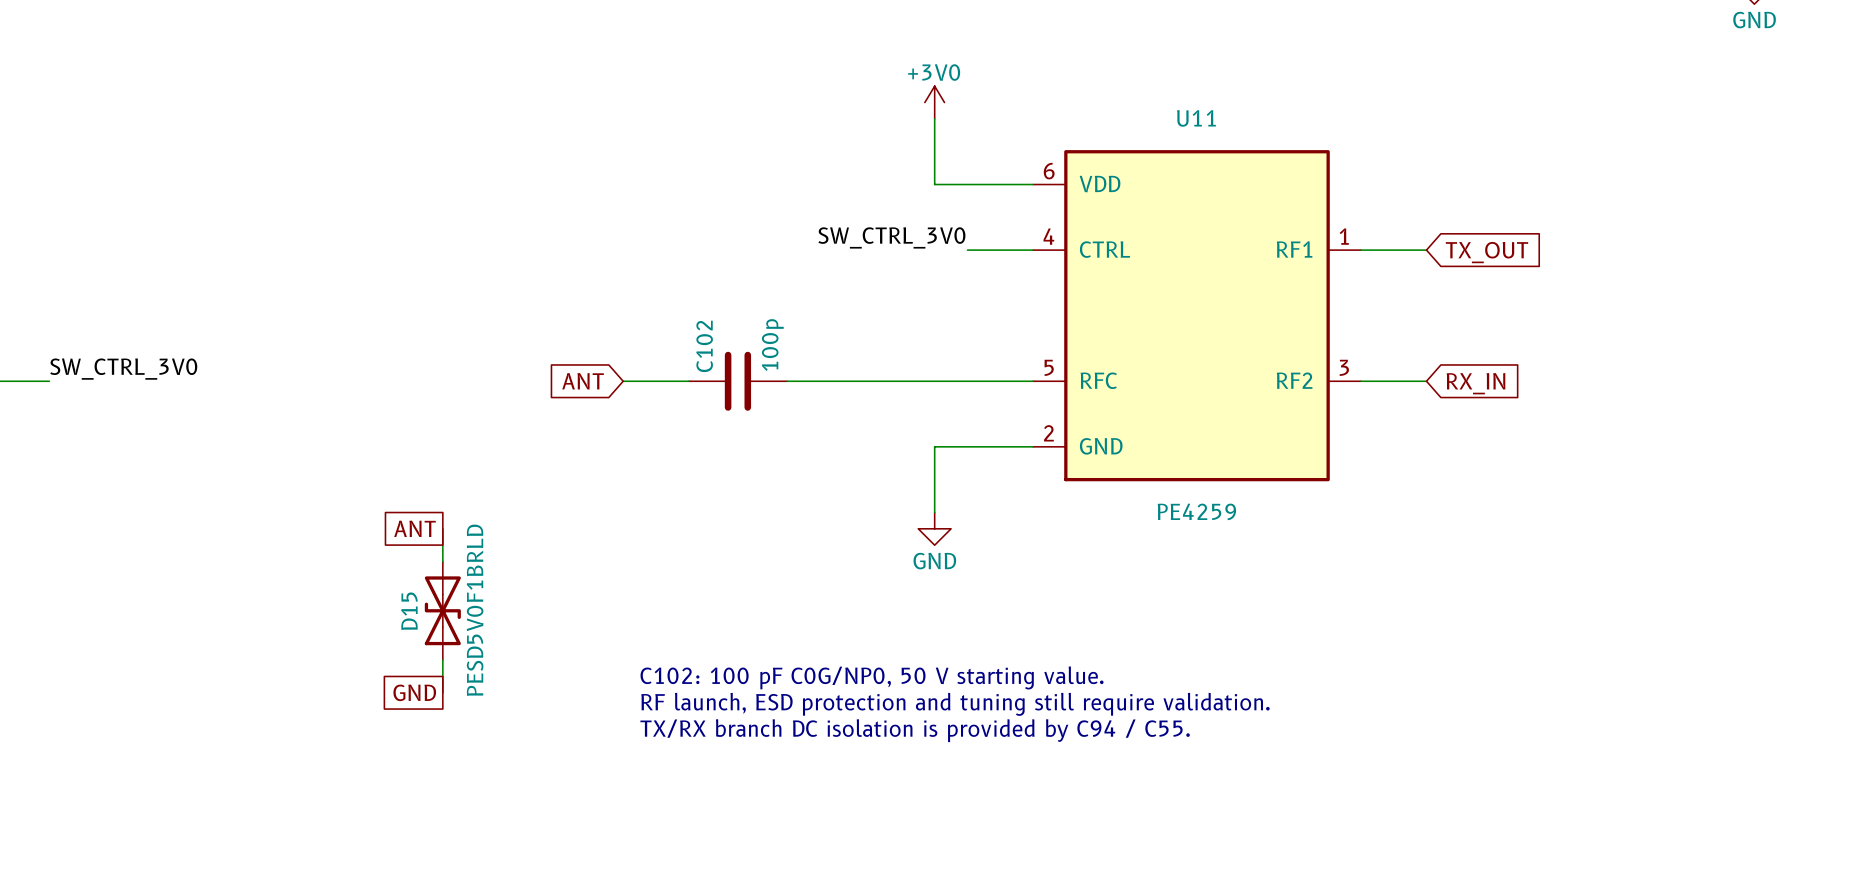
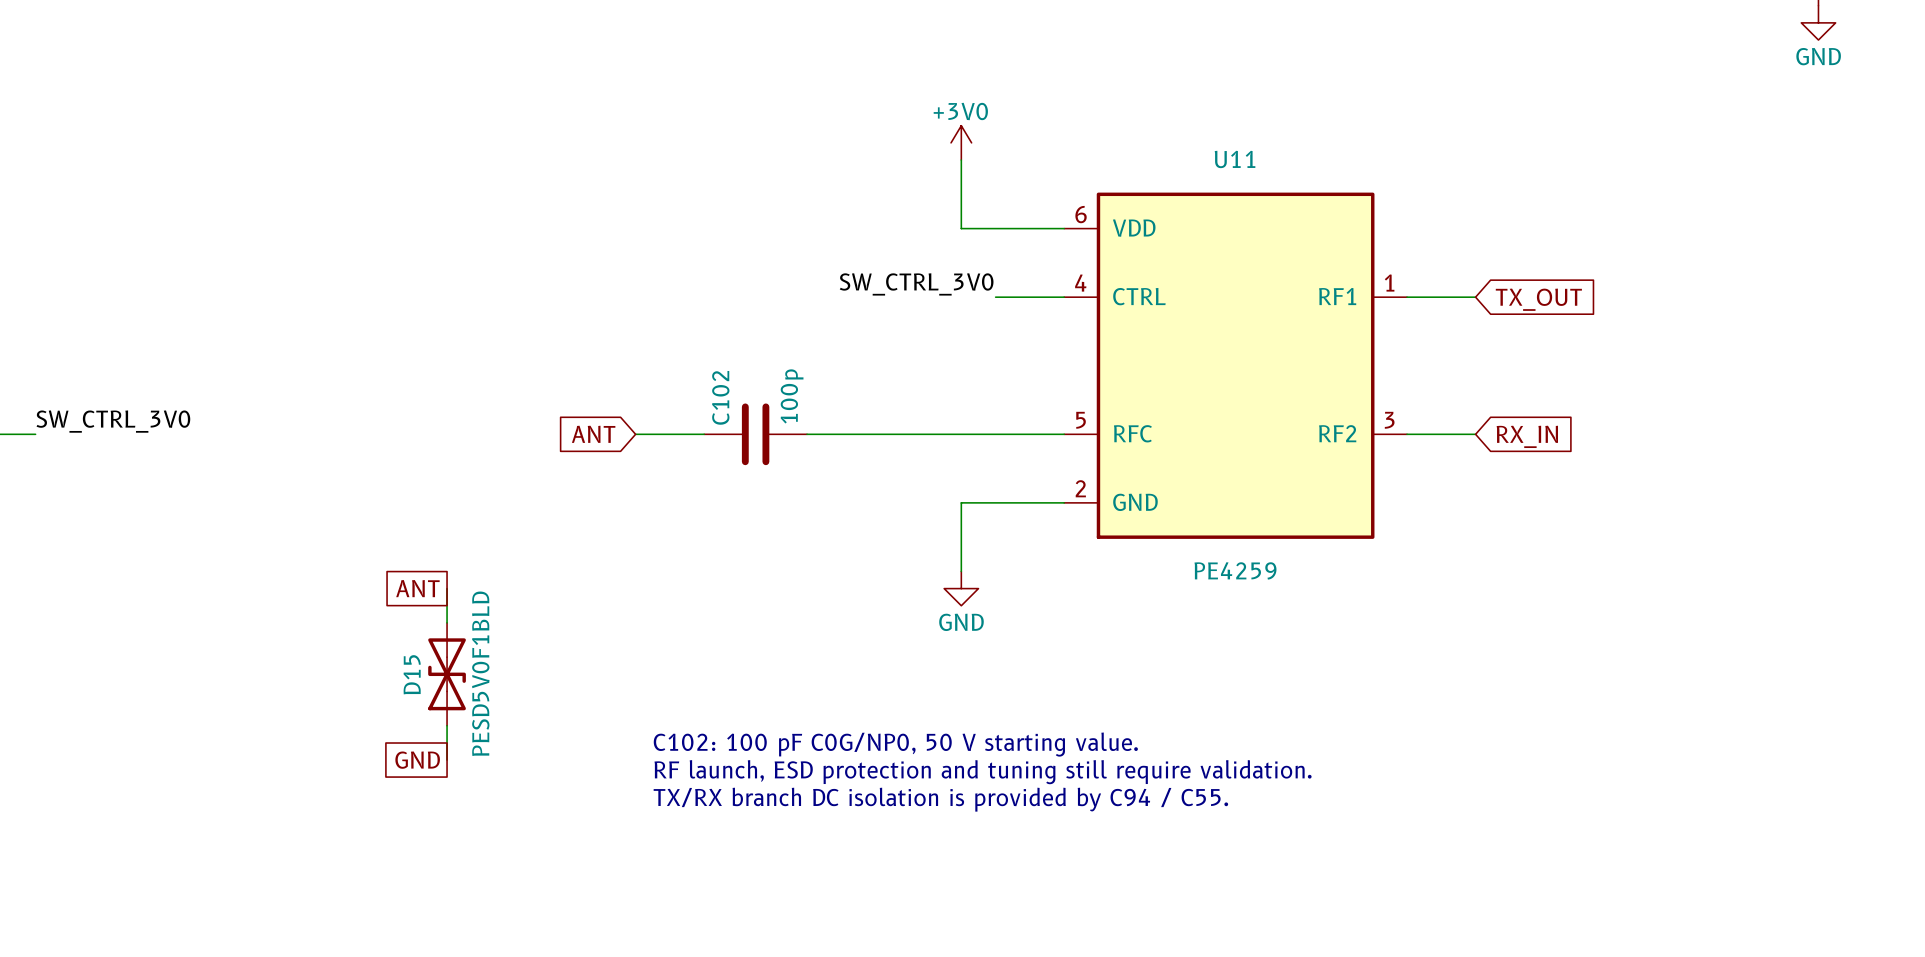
D15 value: PESD5V0F1BRLD (475, 610) -> PESD5V0F1BLD (480, 673)

